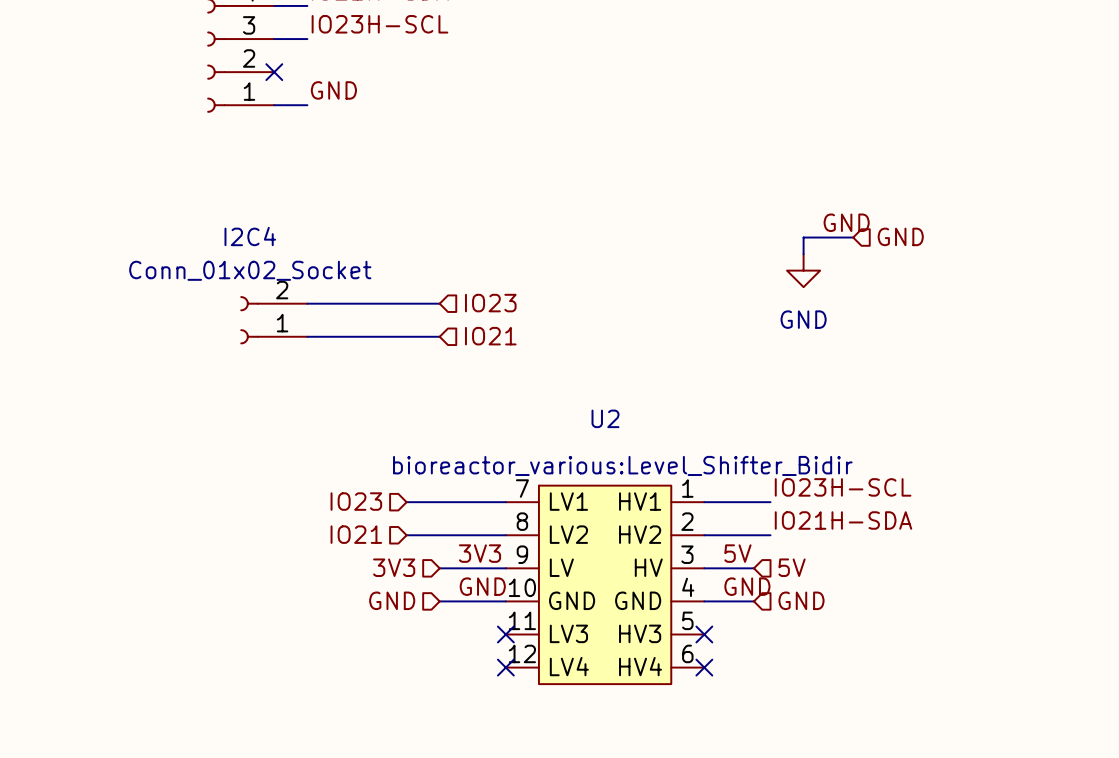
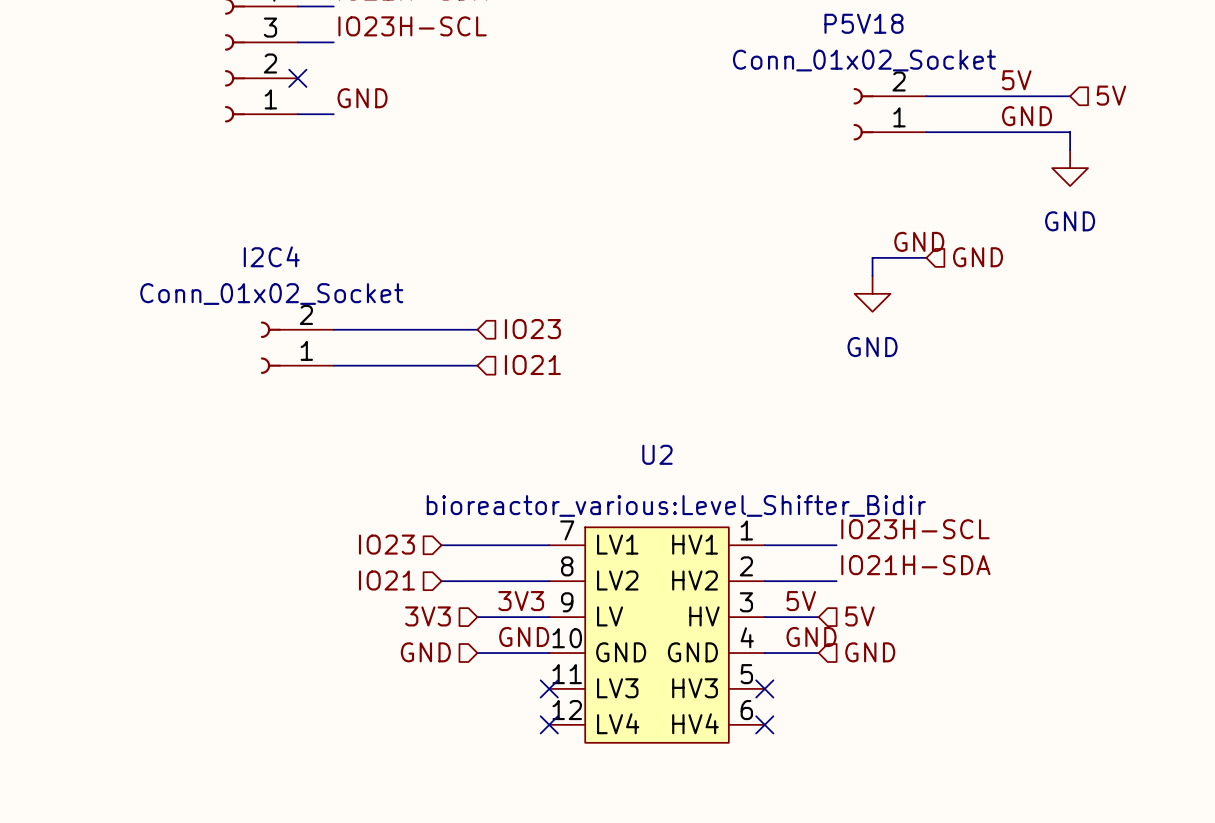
label: none -> 5V (1016, 80)
wire: none -> (926, 96) (1070, 96)
hierarchical label: none -> 5V (1111, 95)
P5V18: none -> Conn_01x02_Socket (889, 114)
label: none -> GND (1027, 116)
wire: none -> (926, 132) (1070, 132) (1070, 150)
power symbol: none -> GND (1070, 168)

